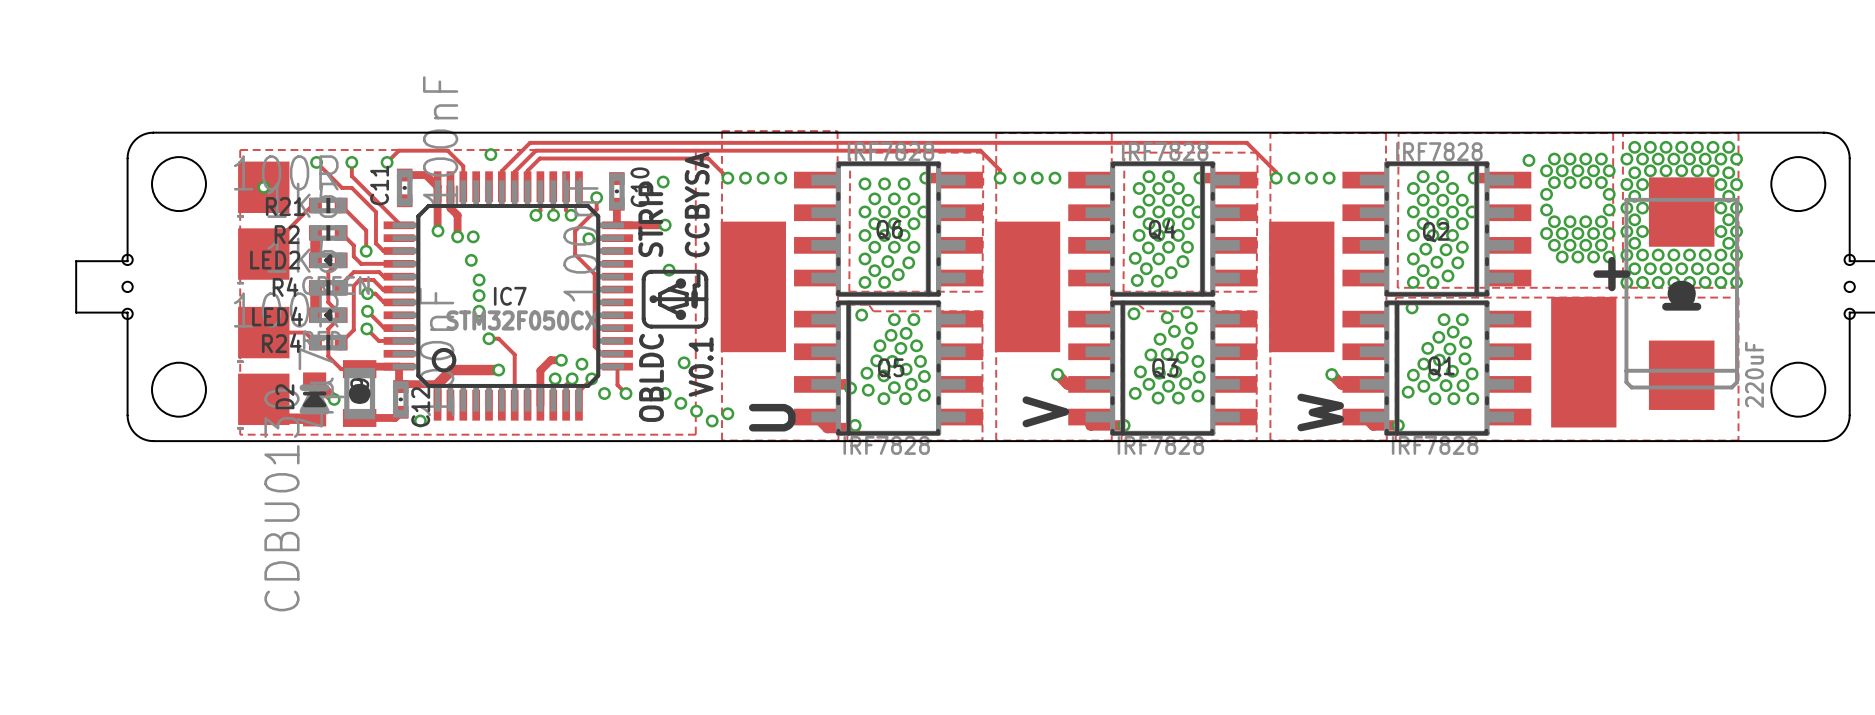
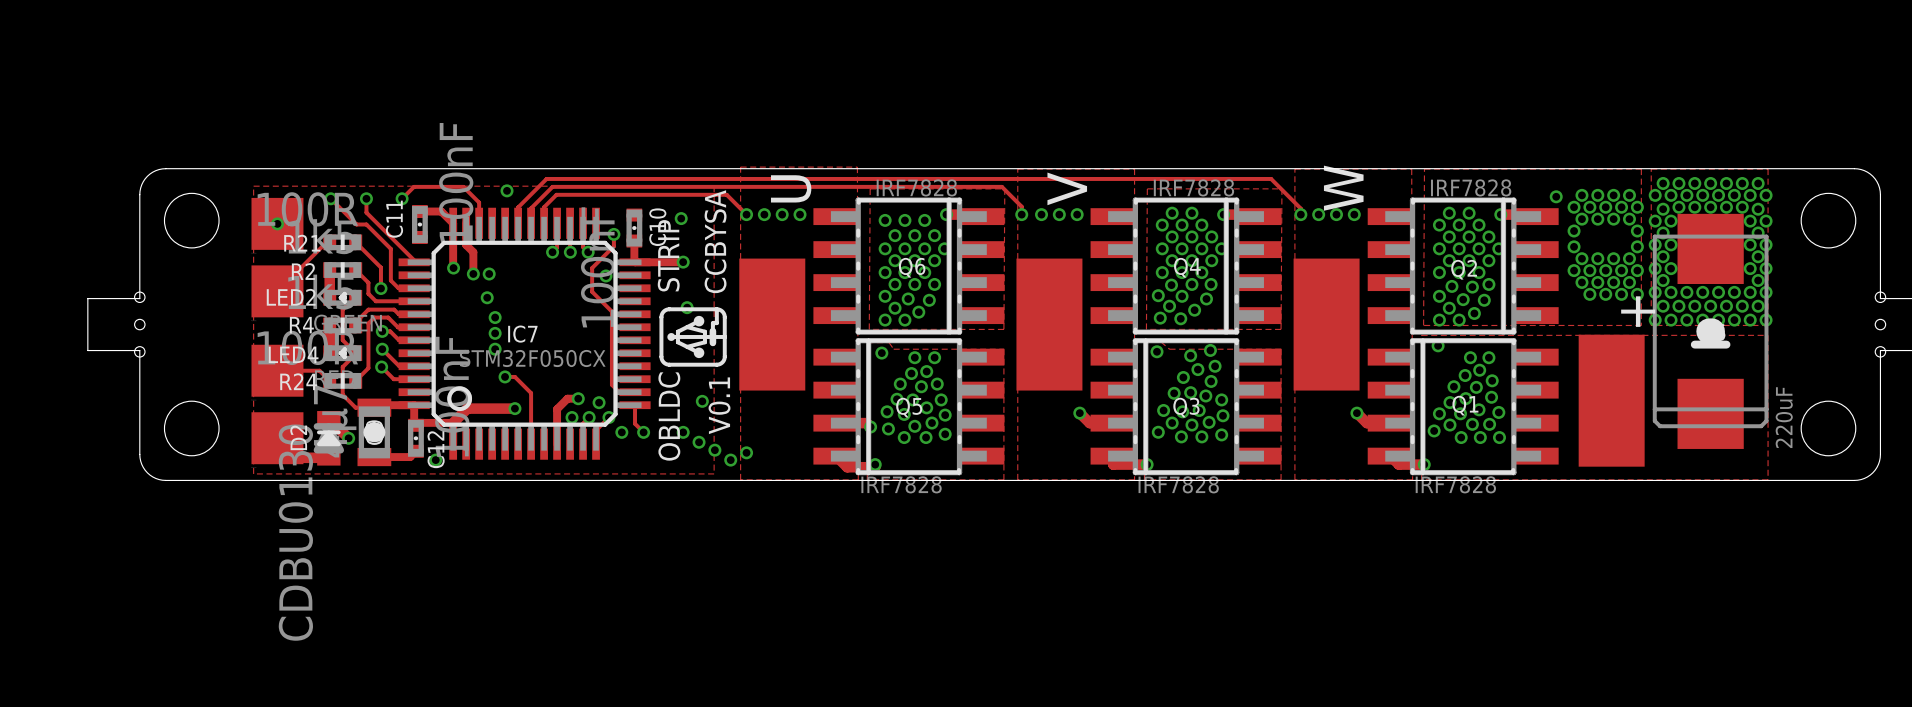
text position: V (1045, 411) -> V (1067, 188)
text position: W (1320, 412) -> W (1343, 188)
text position: U (772, 417) -> U (791, 188)

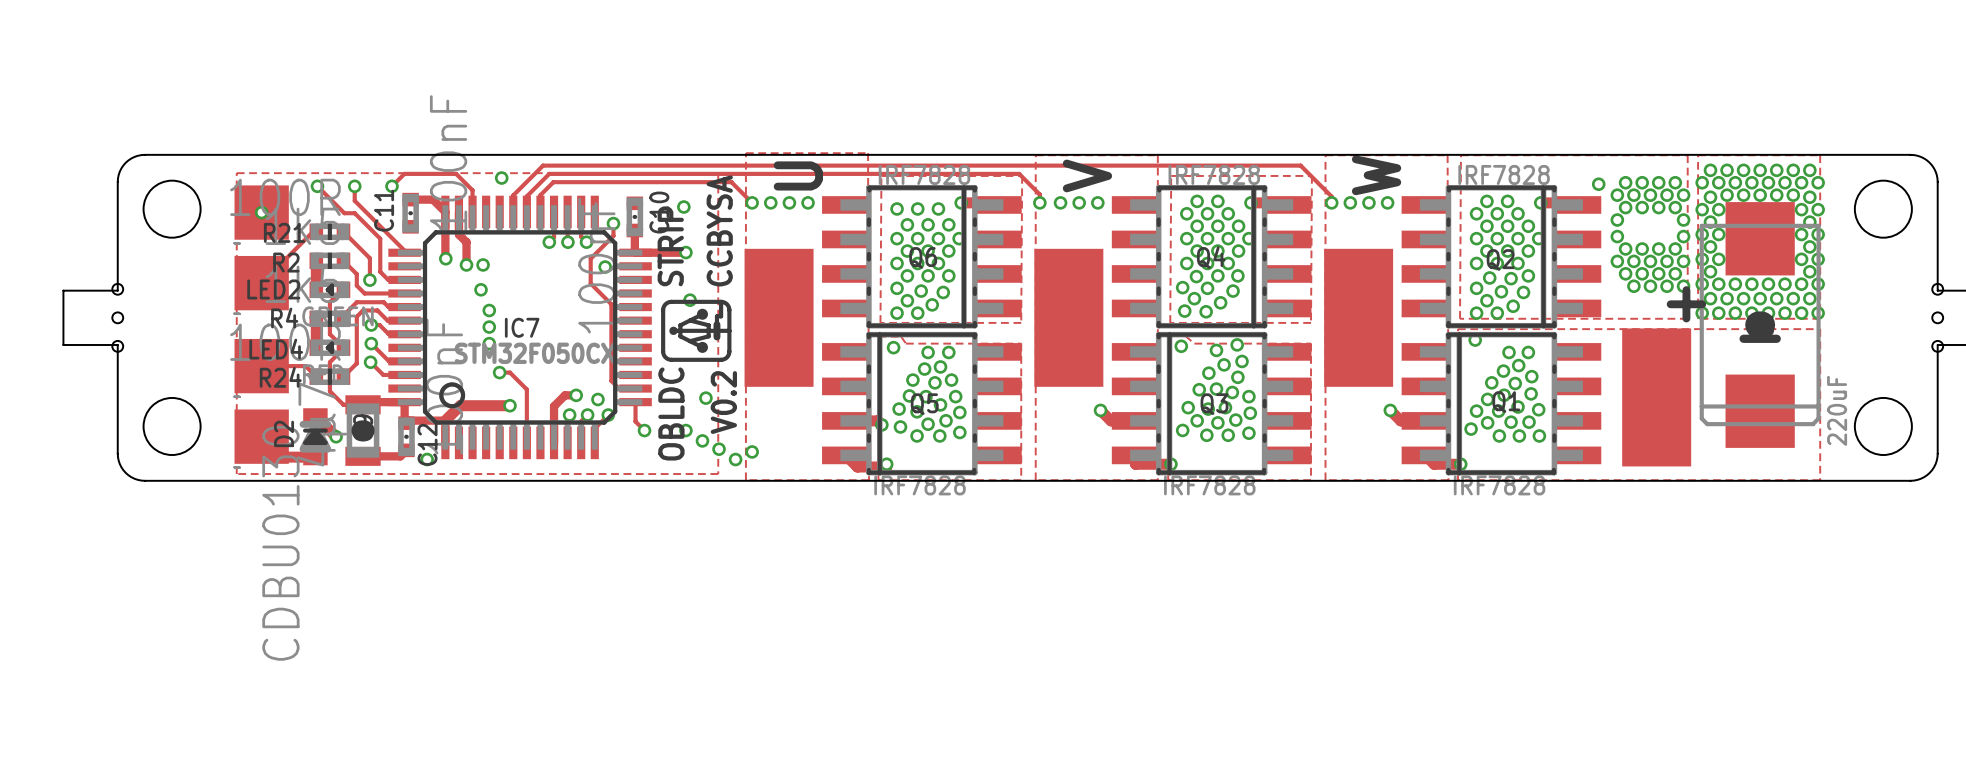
text: V0.1 (719, 405) -> V0.2 (723, 402)
via: (621, 432) -> none

